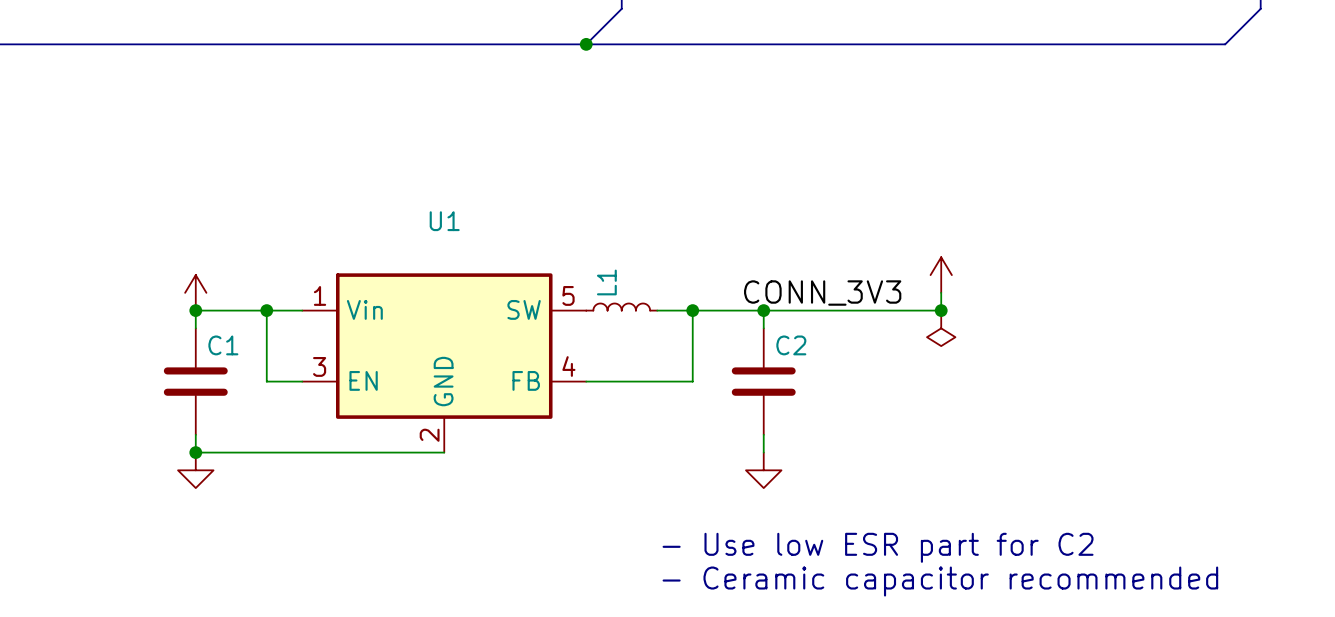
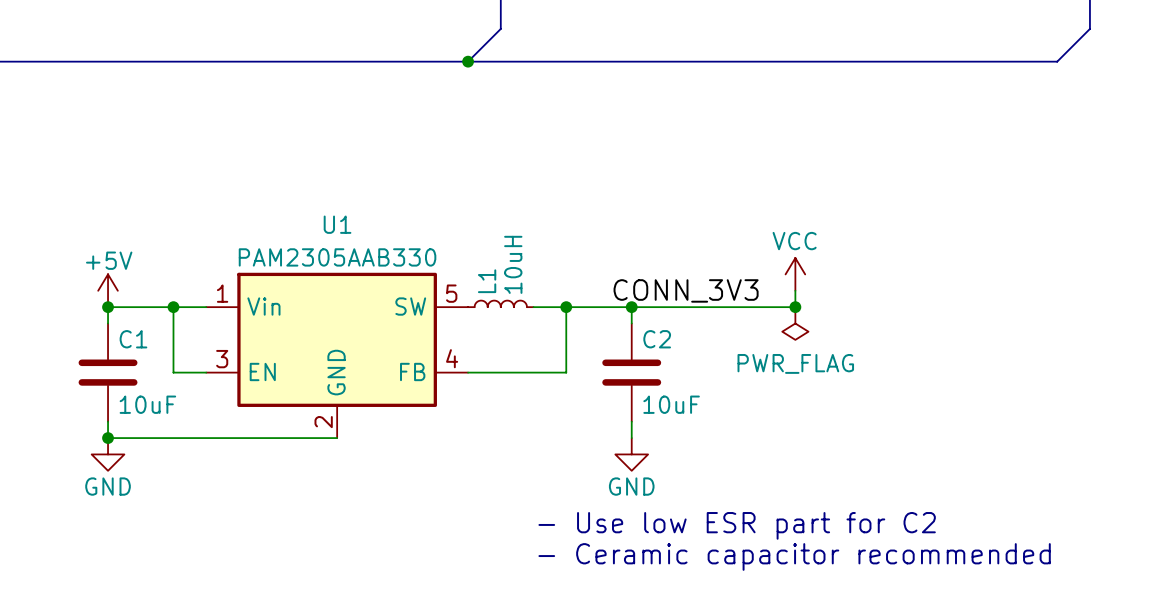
power symbol text: none -> VCC (794, 241)
U1 value: none -> PAM2305AAB330 (337, 257)
power symbol text: none -> +5V (109, 260)
L1 value: none -> 10uH (513, 264)
power symbol text: none -> PWR_FLAG (795, 363)
C1 value: none -> 10uF (147, 404)
C2 value: none -> 10uF (671, 404)
power symbol text: none -> GND (108, 486)
power symbol text: none -> GND (631, 486)

